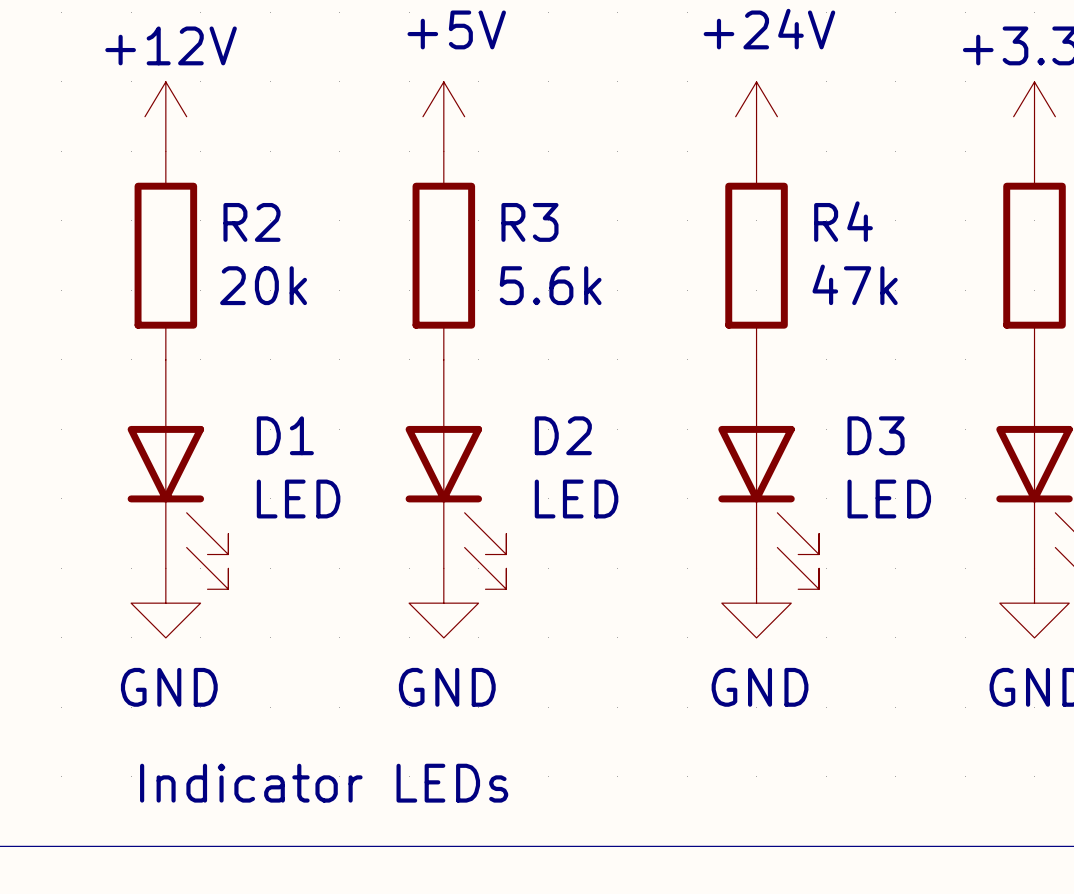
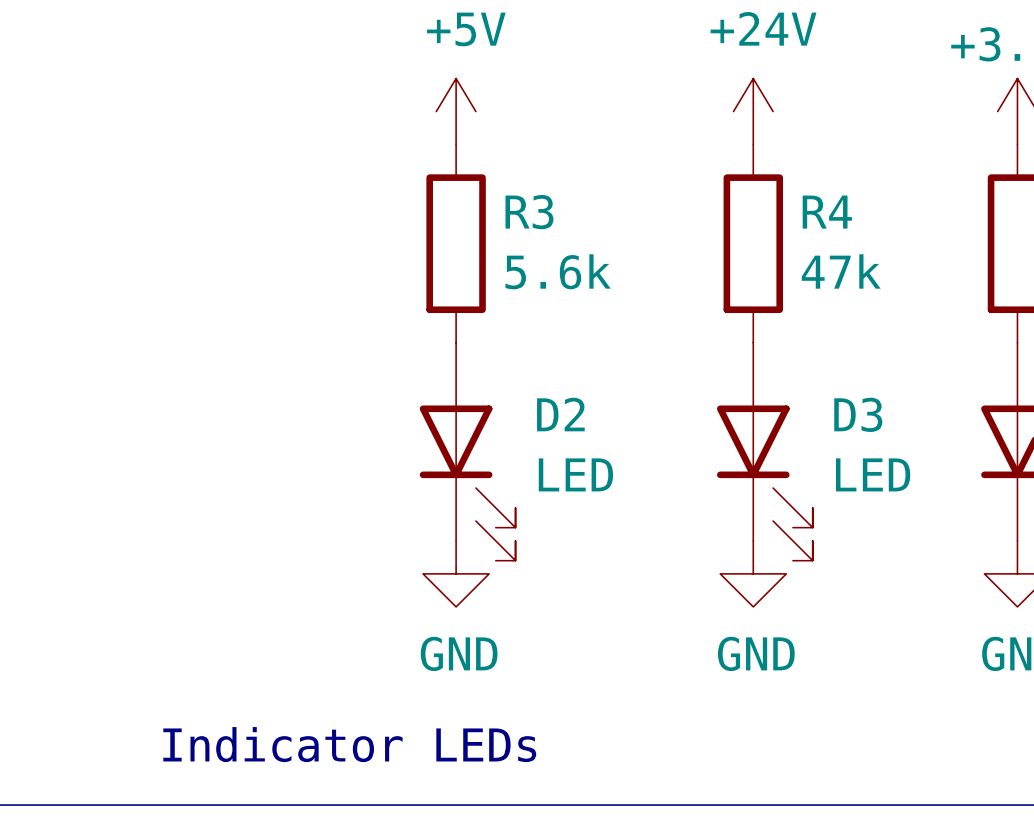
power symbol: +12V (165, 116) -> none
R2: 20k (165, 255) -> none
D1: LED (178, 474) -> none
power symbol: GND (165, 603) -> none

